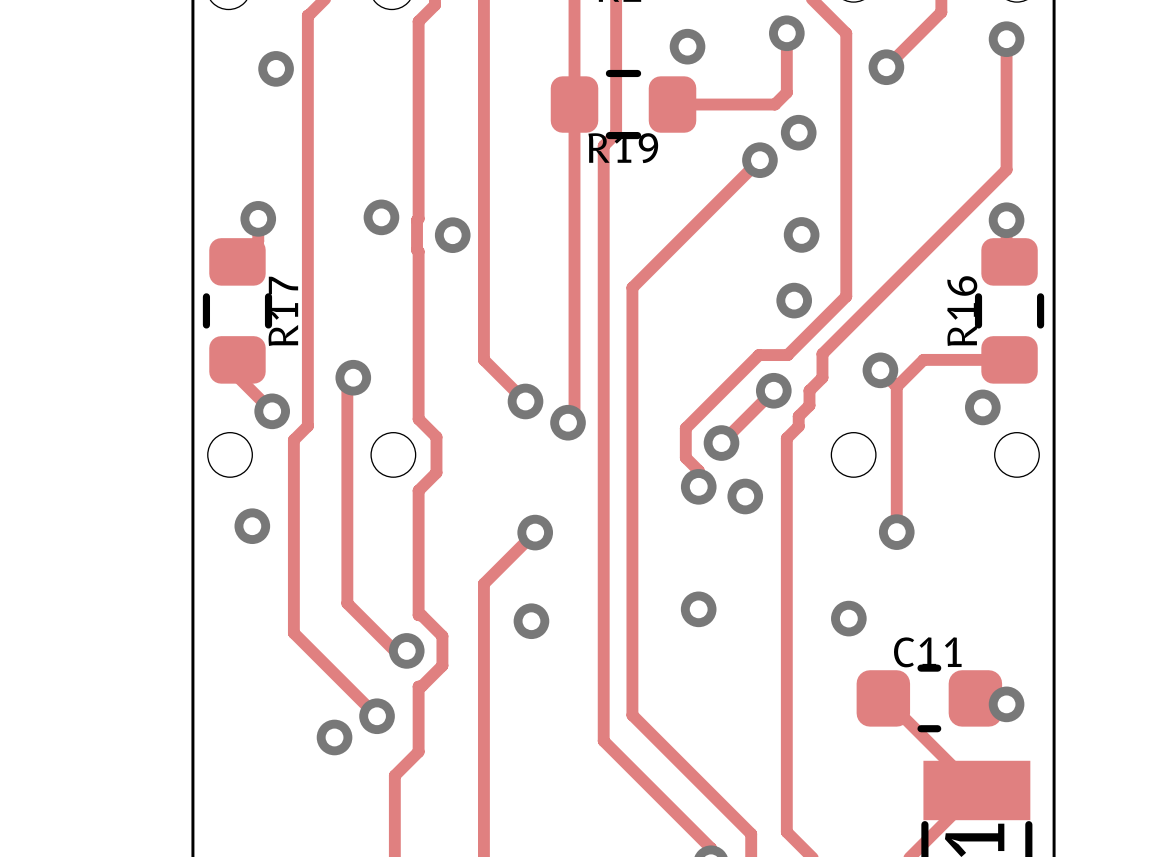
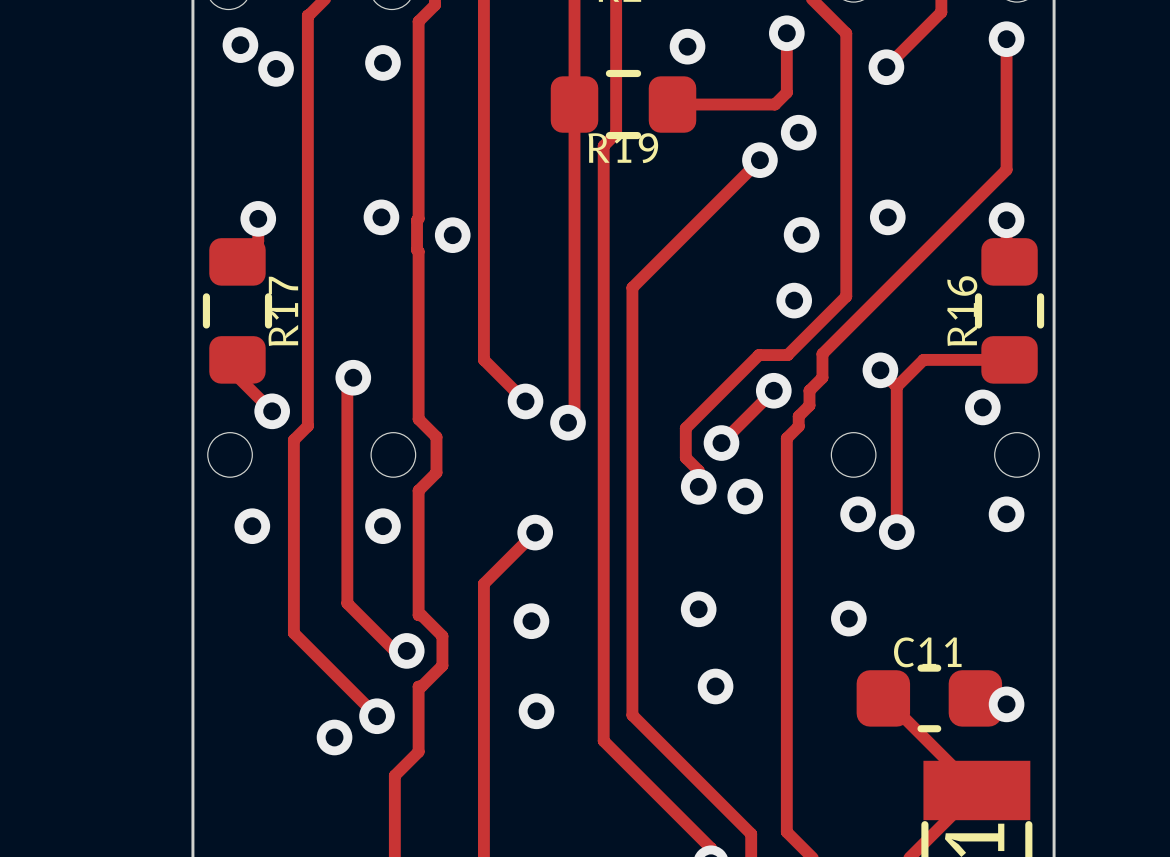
via: none -> (240, 45)
via: none -> (382, 62)
via: none -> (887, 217)
via: none -> (858, 514)
via: none -> (1006, 514)
via: none -> (382, 526)
via: none -> (715, 686)
via: none -> (536, 711)

